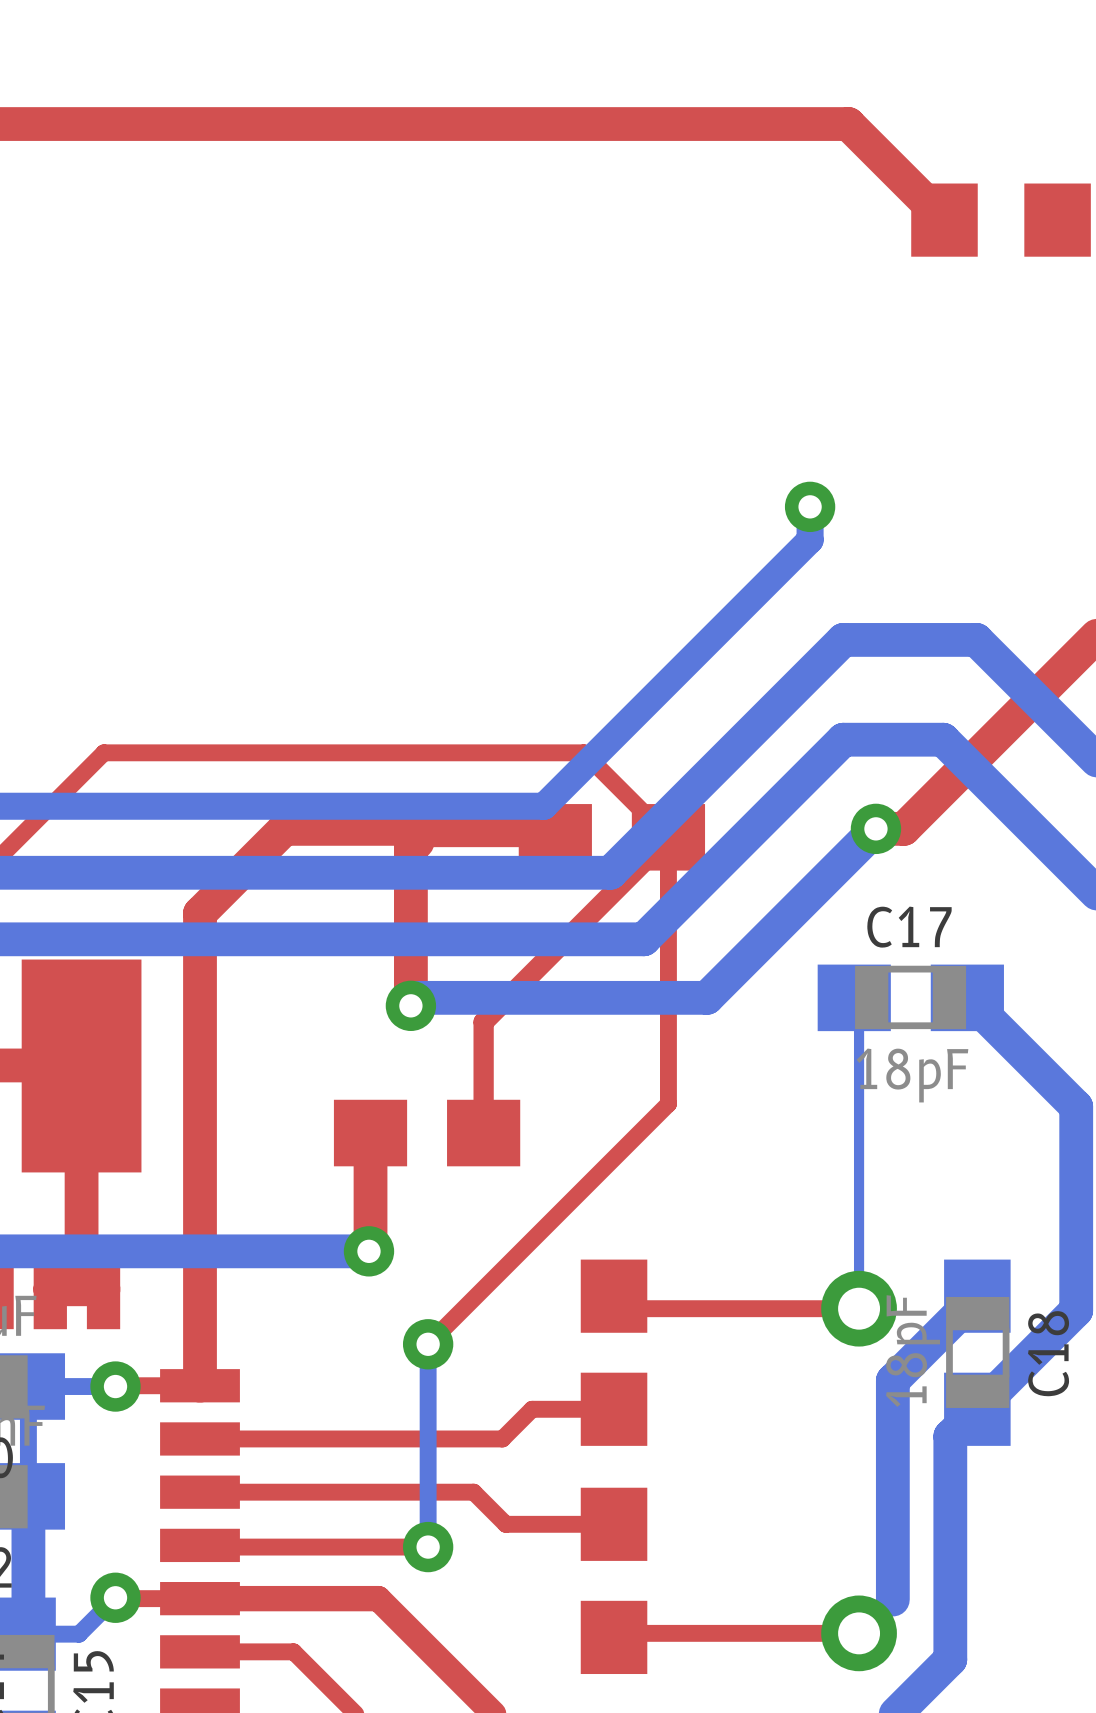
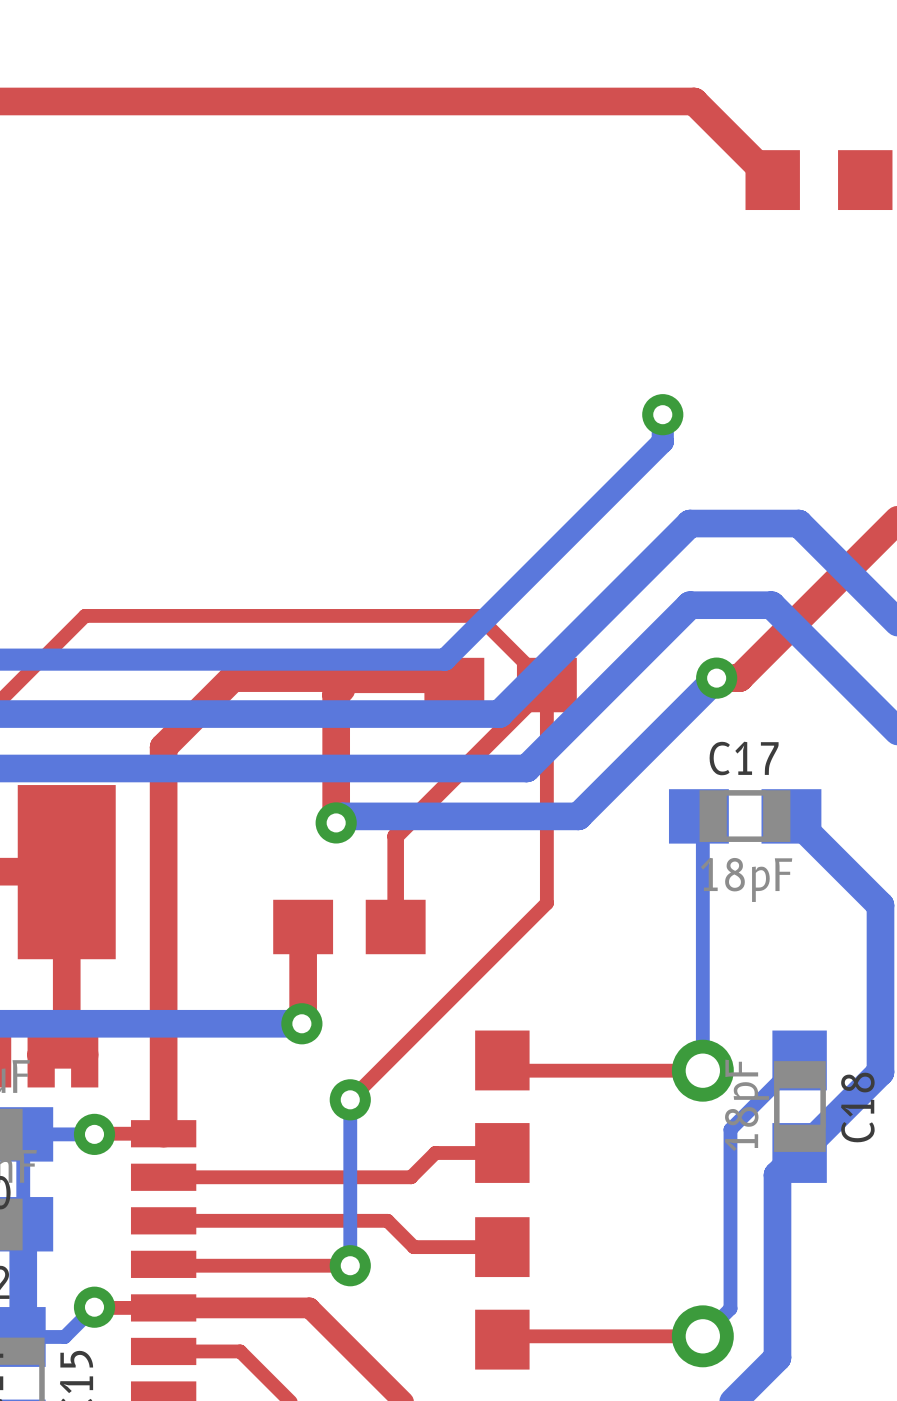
bottom track width: thin (859, 1002) (859, 1308) -> thick (702, 820) (702, 1070)
bottom track width: thick (977, 1296) (892, 1380) (892, 1599) -> thin (799, 1060) (730, 1129) (730, 1308)

